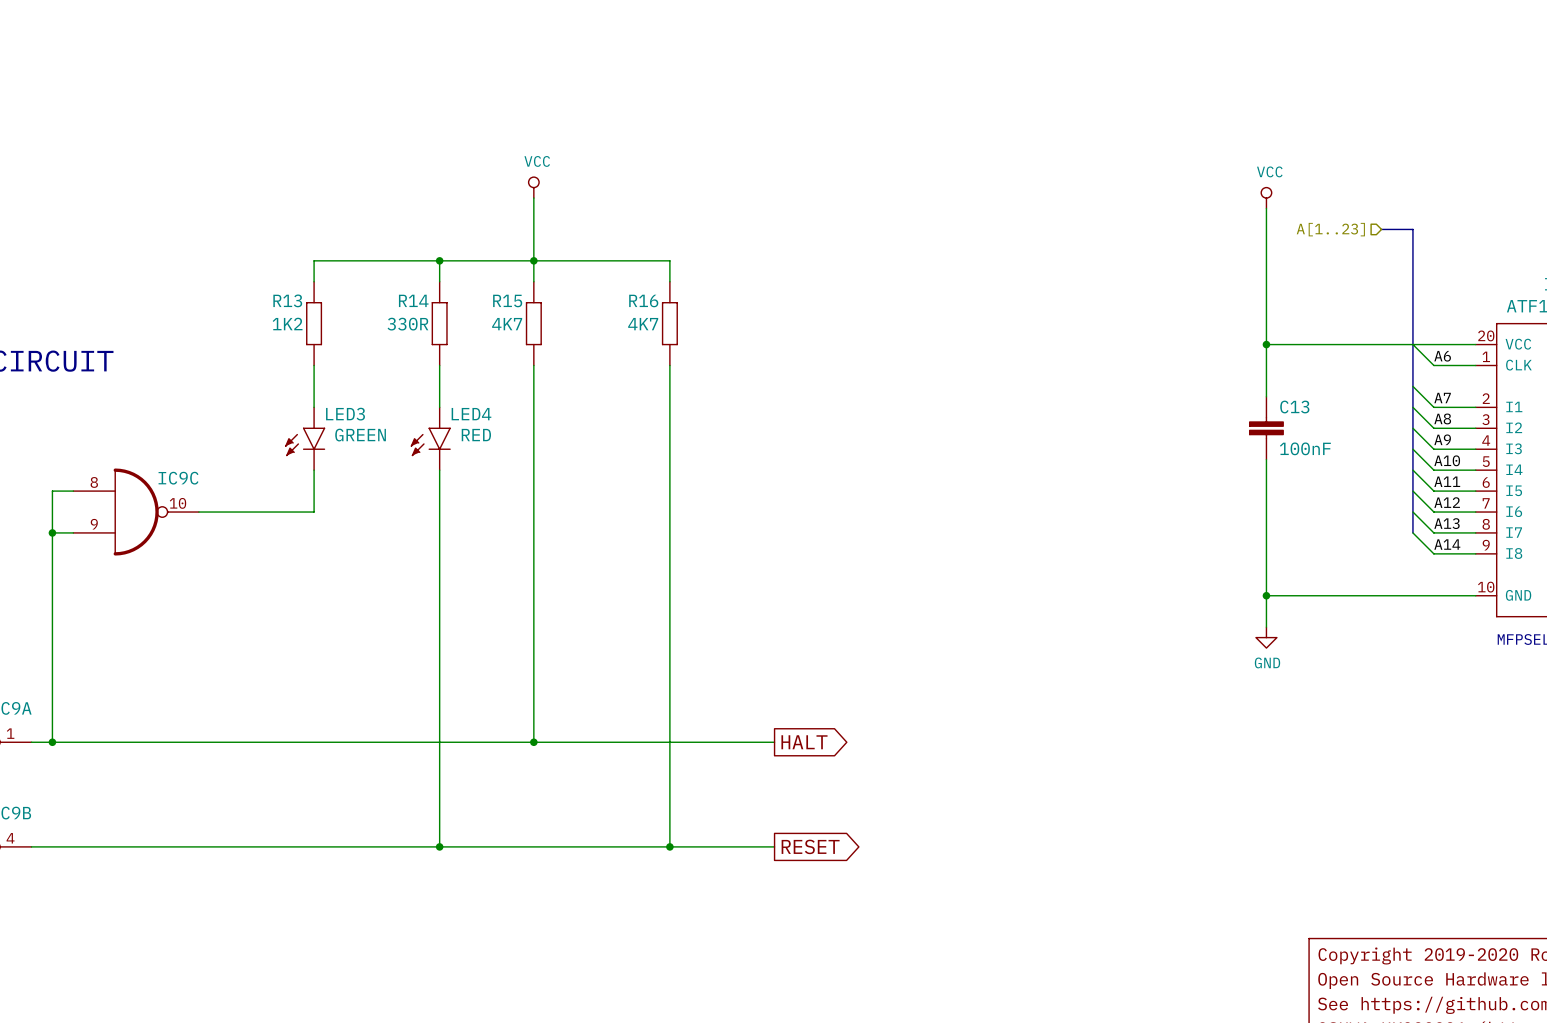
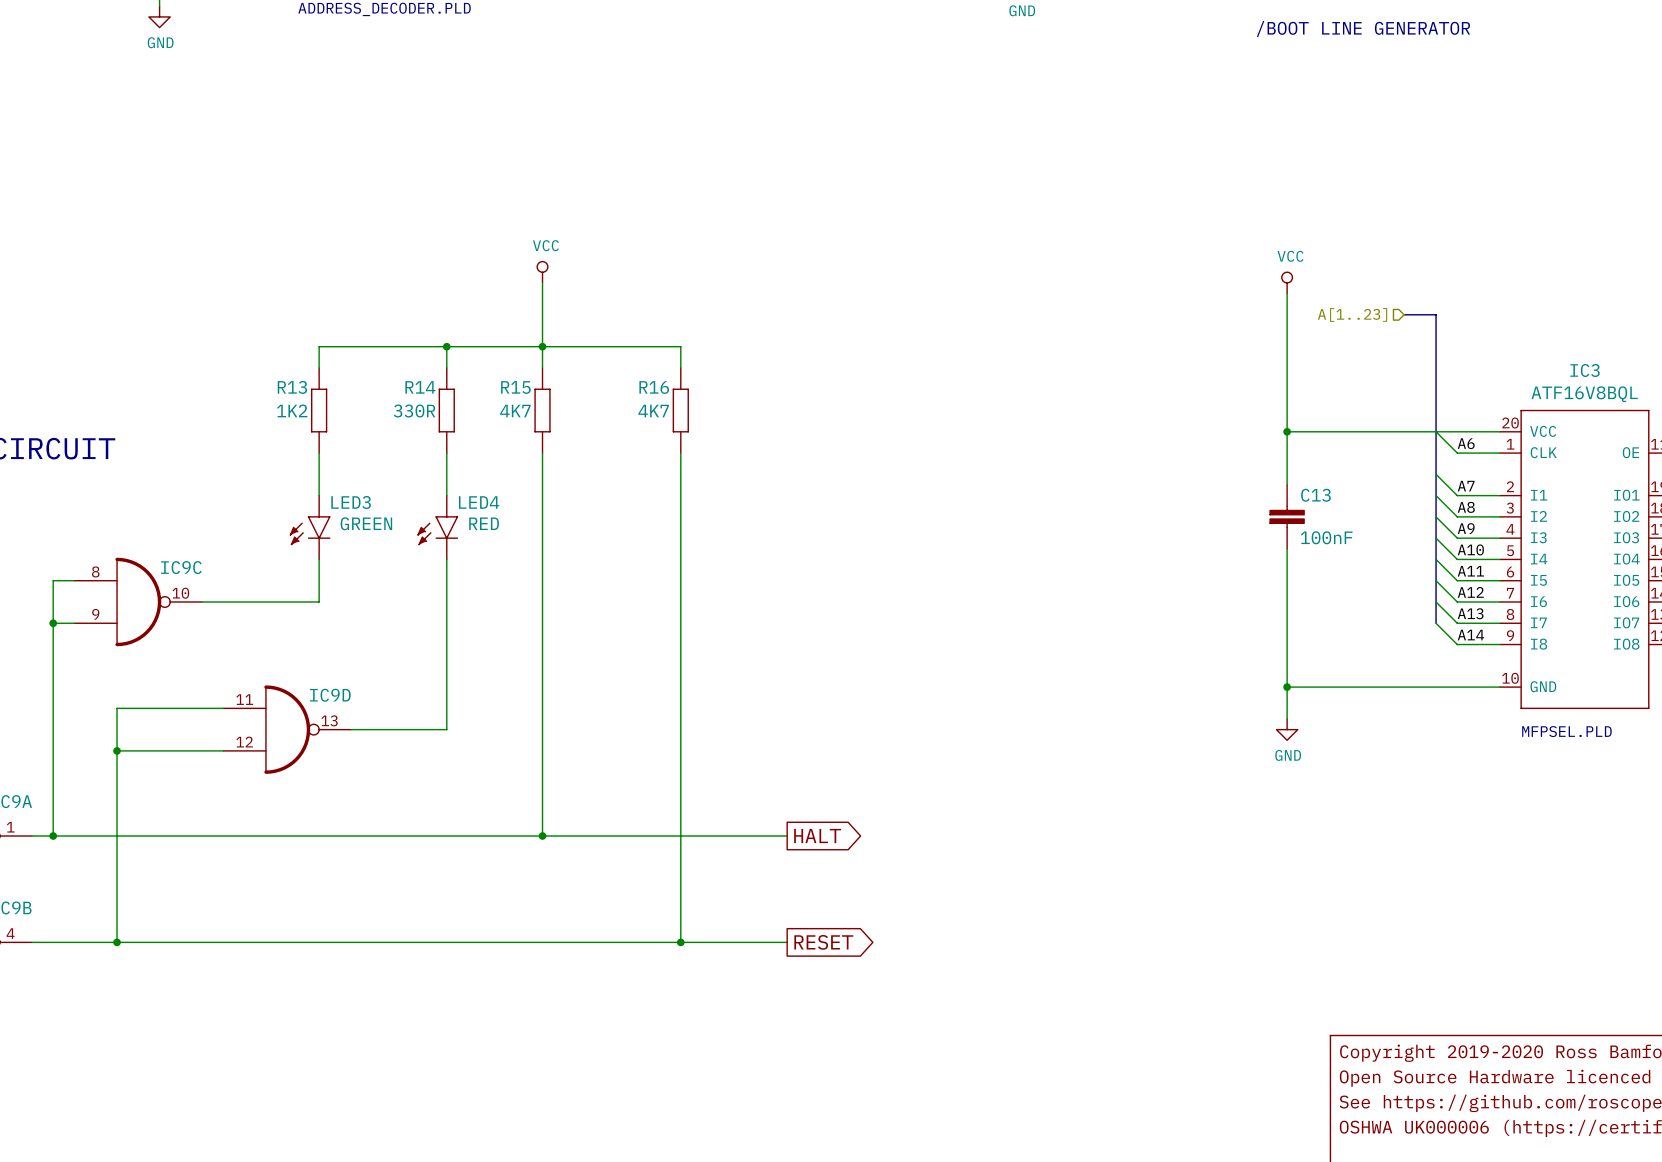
wire: none -> (223, 708) (117, 708) (117, 942)
IC9D: none -> (287, 729)
wire: (439, 637) (439, 846) -> (446, 729) (351, 729)
wire: none -> (117, 750) (223, 750)
junction: none -> (117, 750)
junction: none -> (117, 942)
junction: (439, 846) -> none

